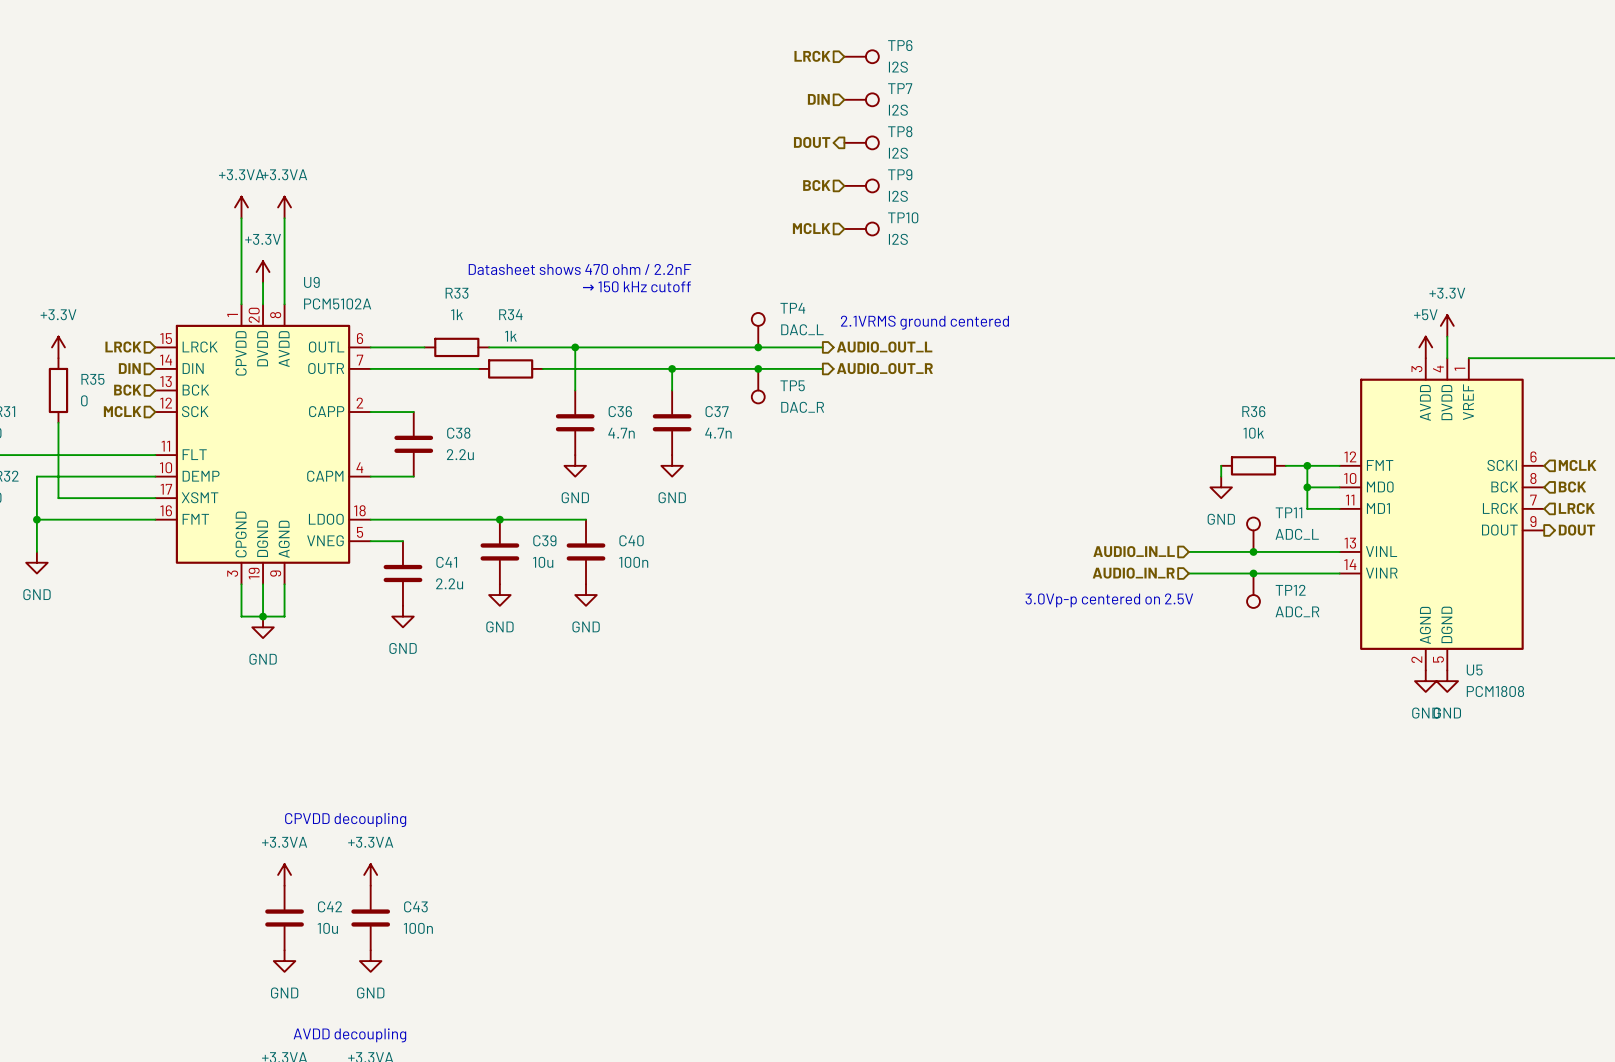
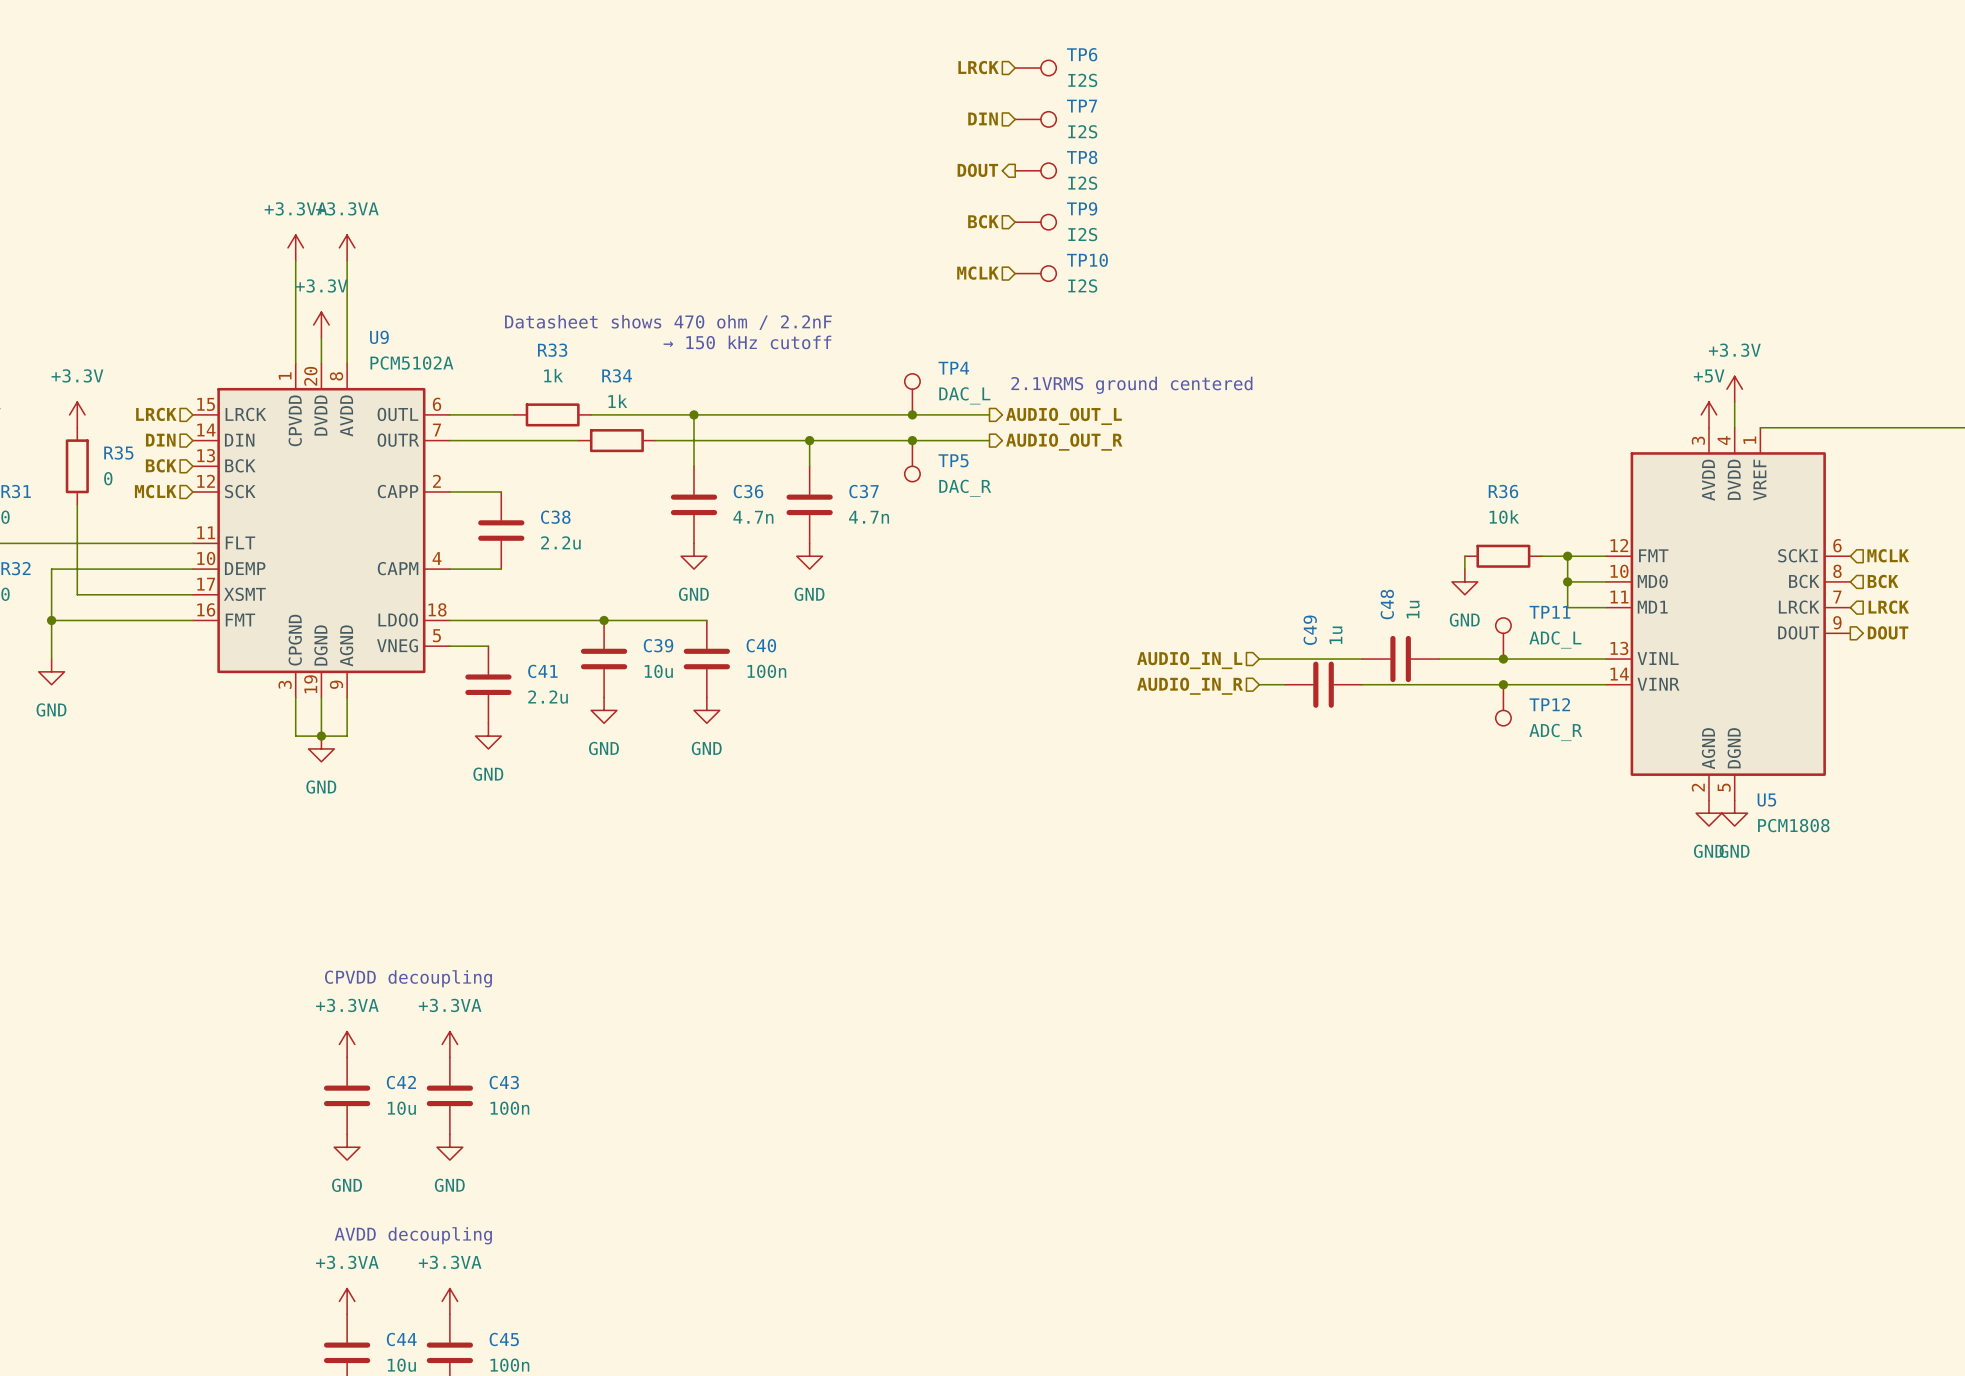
wire: none -> (1259, 659) (1362, 659)
hierarchical label position: AUDIO_IN_L (1134, 551) -> AUDIO_IN_L (1189, 660)
C48: none -> 1u (1400, 659)
wire: none -> (1259, 684) (1285, 684)
C49: none -> 1u (1323, 684)
hierarchical label position: AUDIO_IN_R (1133, 573) -> AUDIO_IN_R (1190, 686)
wire: none -> (1362, 684) (1426, 684)
text: 3.0Vp-p centered on 2.5V (1109, 600) -> none

